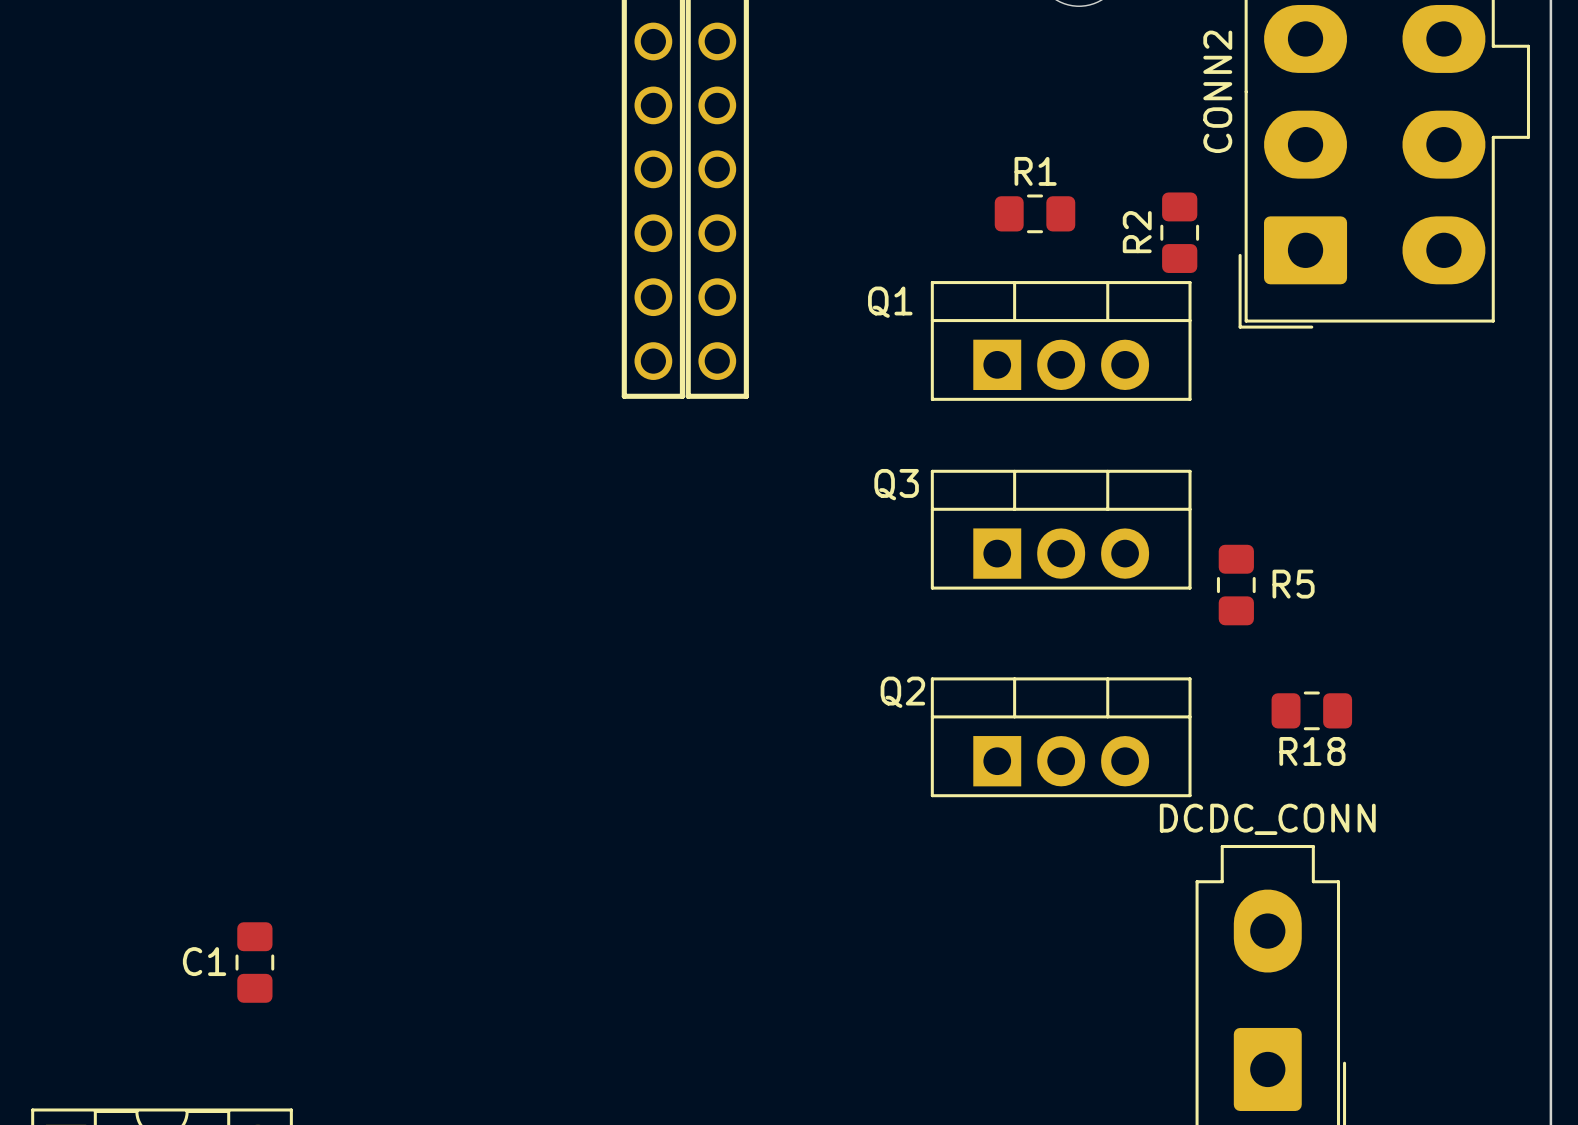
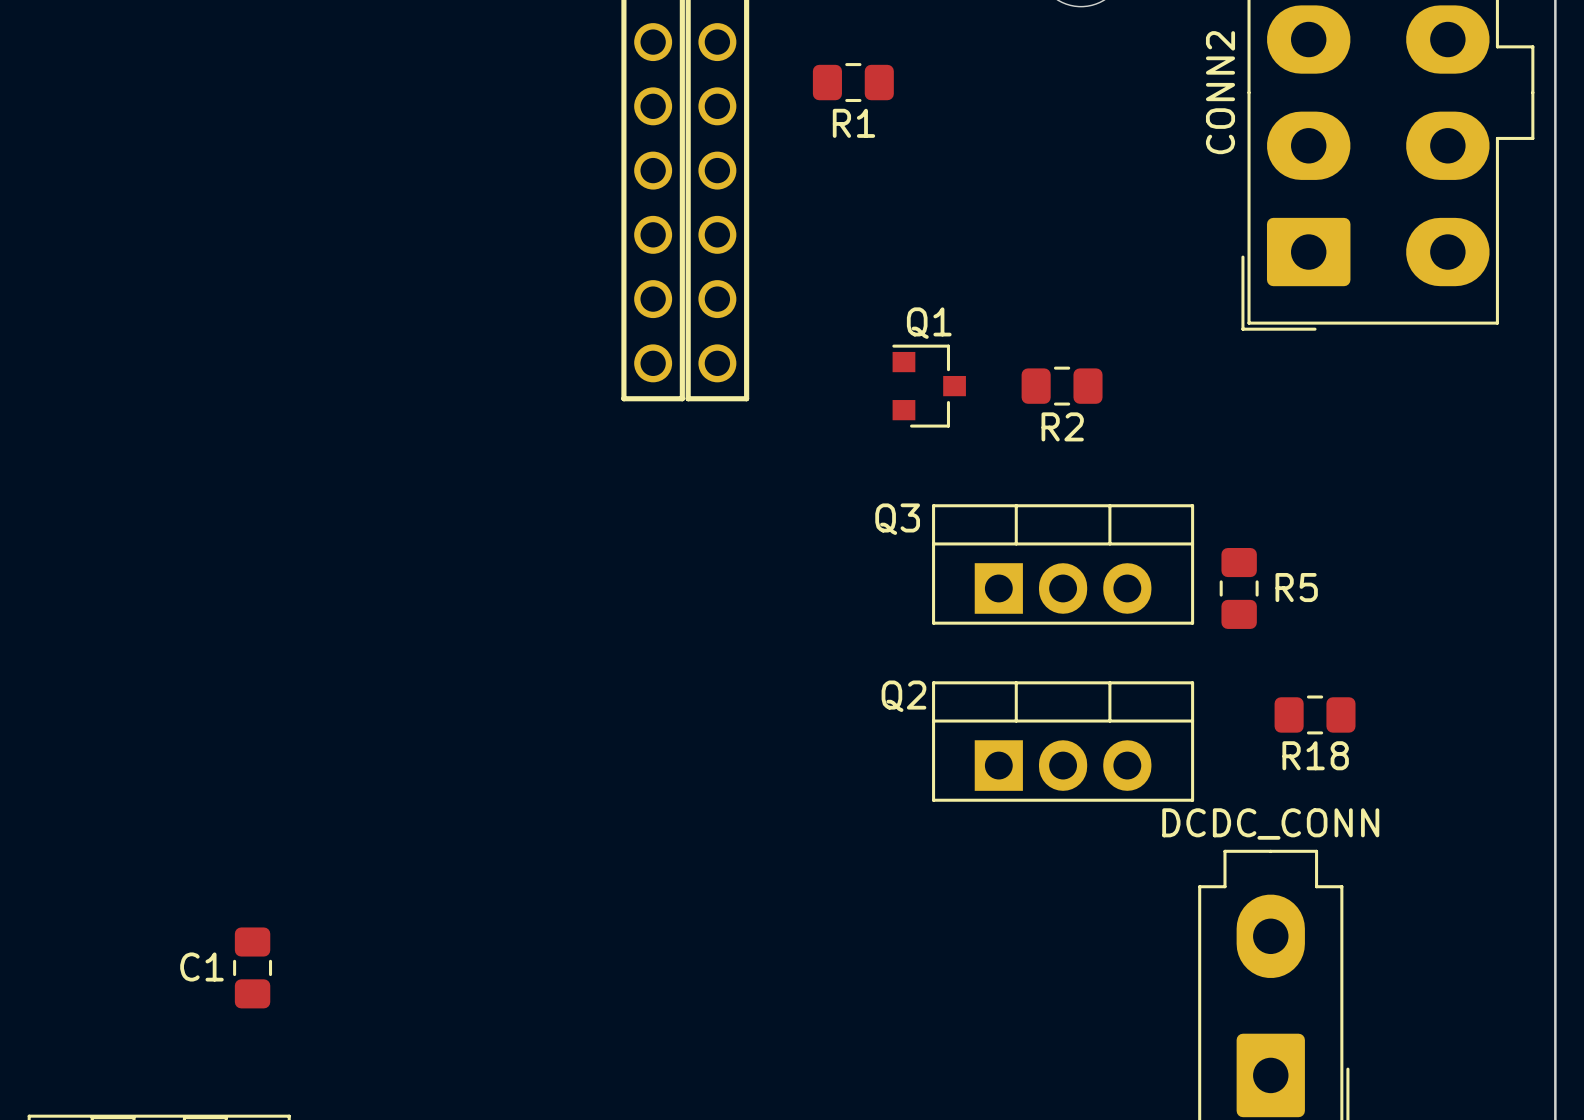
R1 name position: R1 (1035, 171) -> R1 (853, 123)
R1 position: (1035, 213) -> (853, 82)
R2 name position: R2 (1137, 232) -> R2 (1062, 426)
R2 rotation: 0° (1179, 232) -> 90° clockwise (1062, 386)
R2 position: (1179, 232) -> (1062, 386)
Q1 footprint: [930, 281, 1192, 401] -> [892, 344, 966, 428]
Q1 name position: Q1 (890, 302) -> Q1 (929, 323)
Q3 position: (1061, 529) -> (1063, 564)

